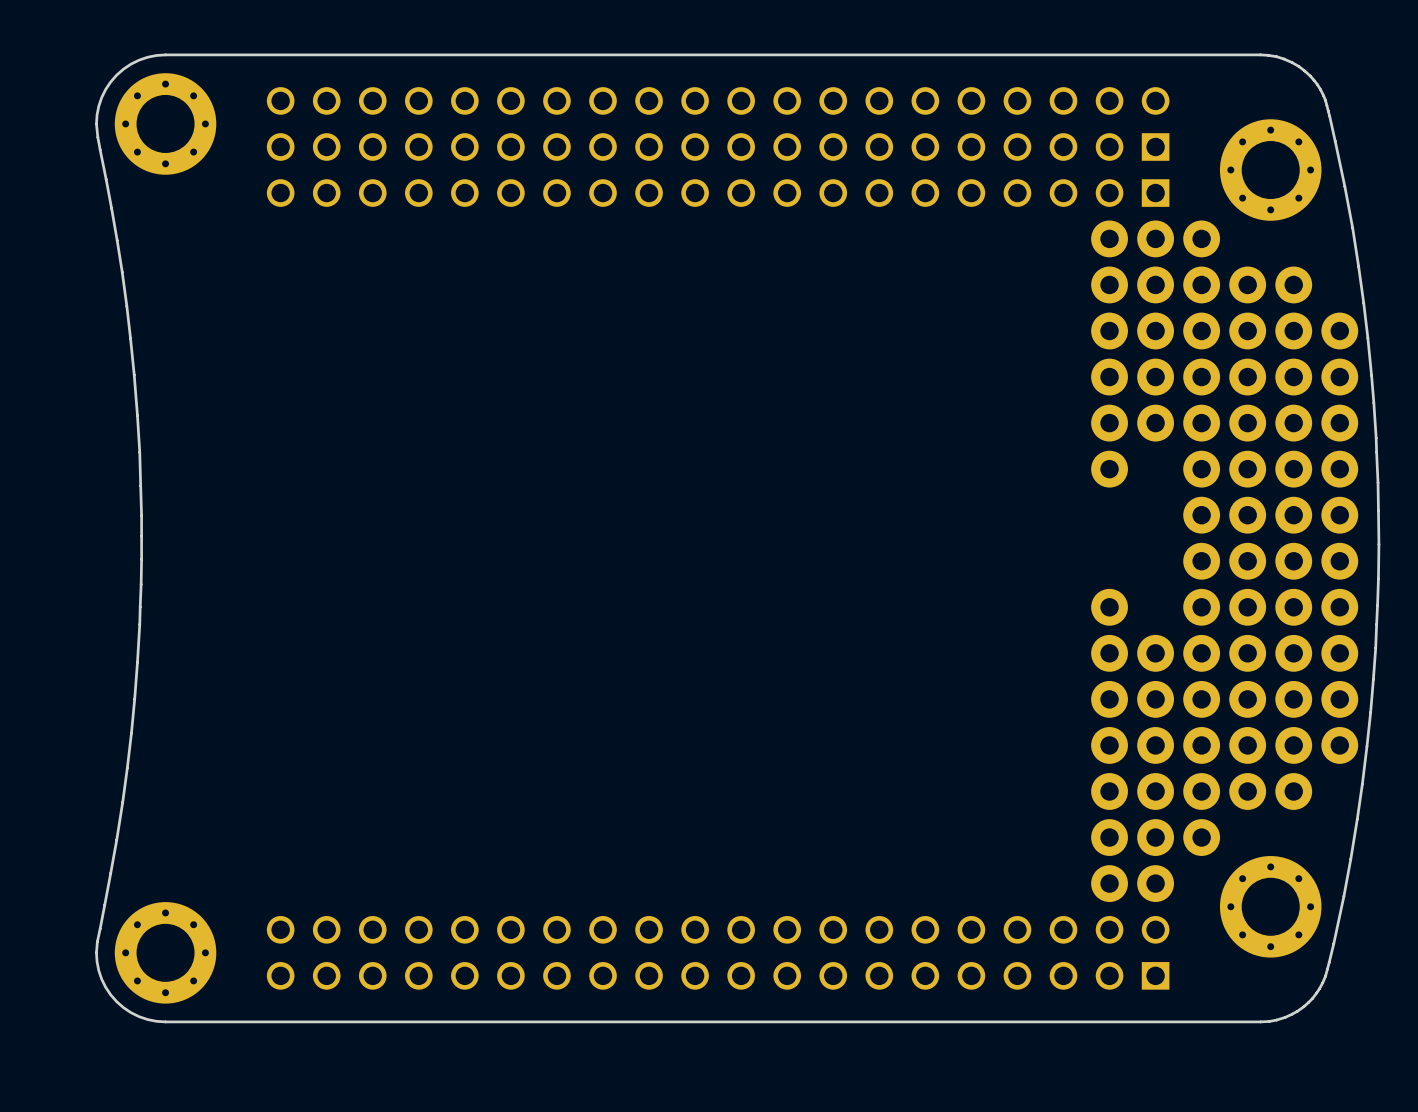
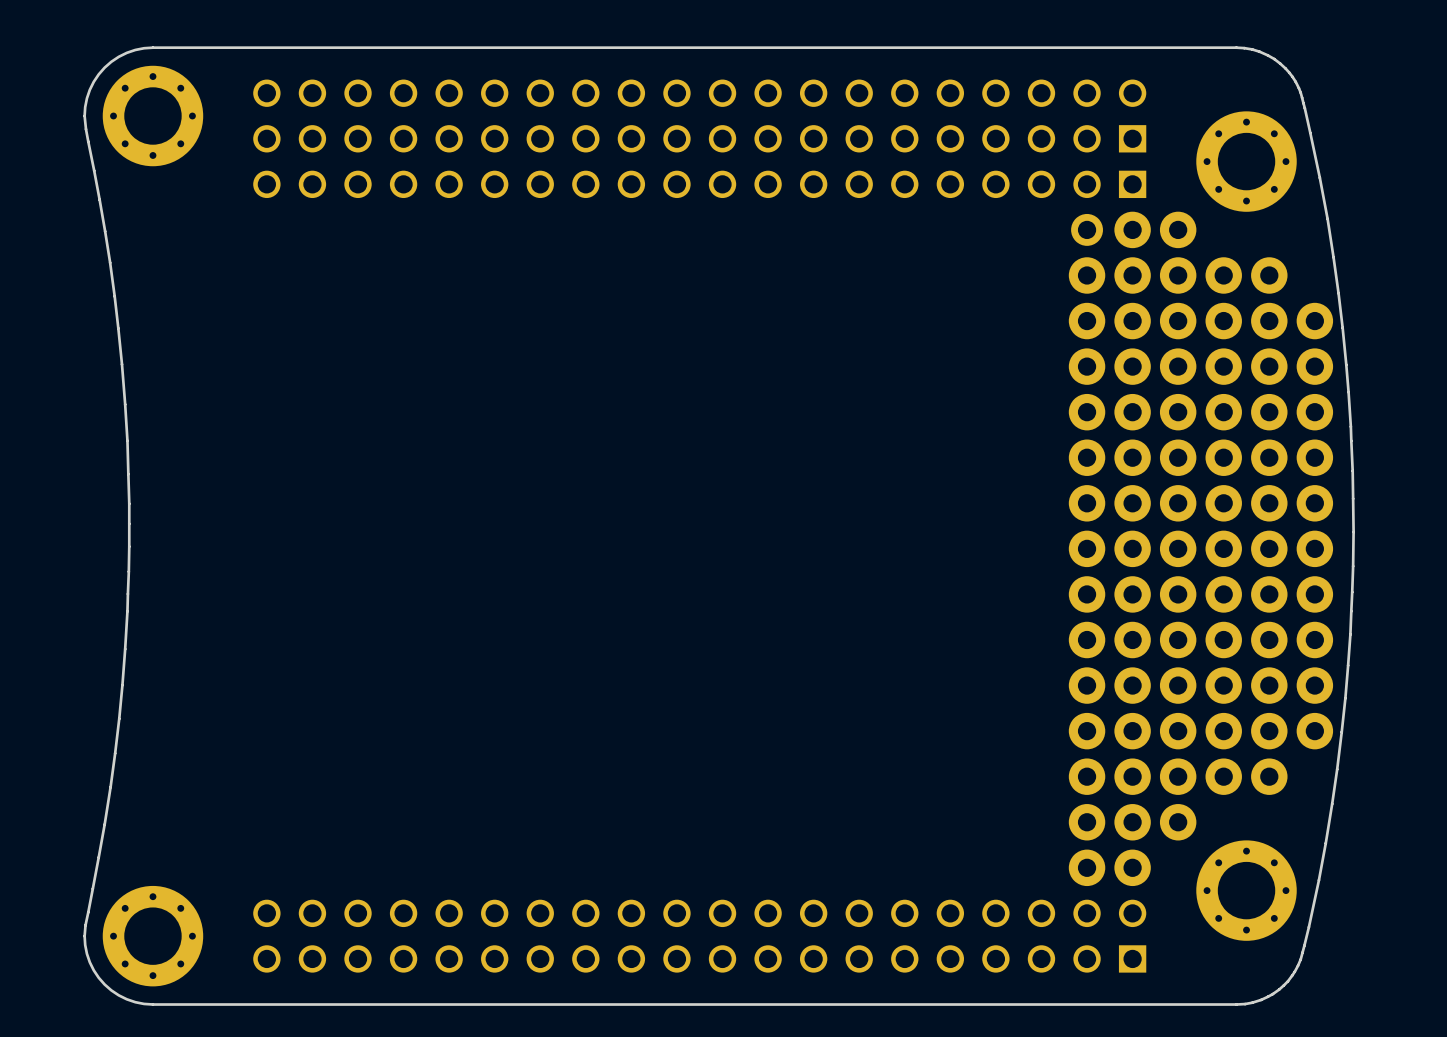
part footprint: [1091, 220, 1359, 903] -> [1068, 211, 1334, 887]

